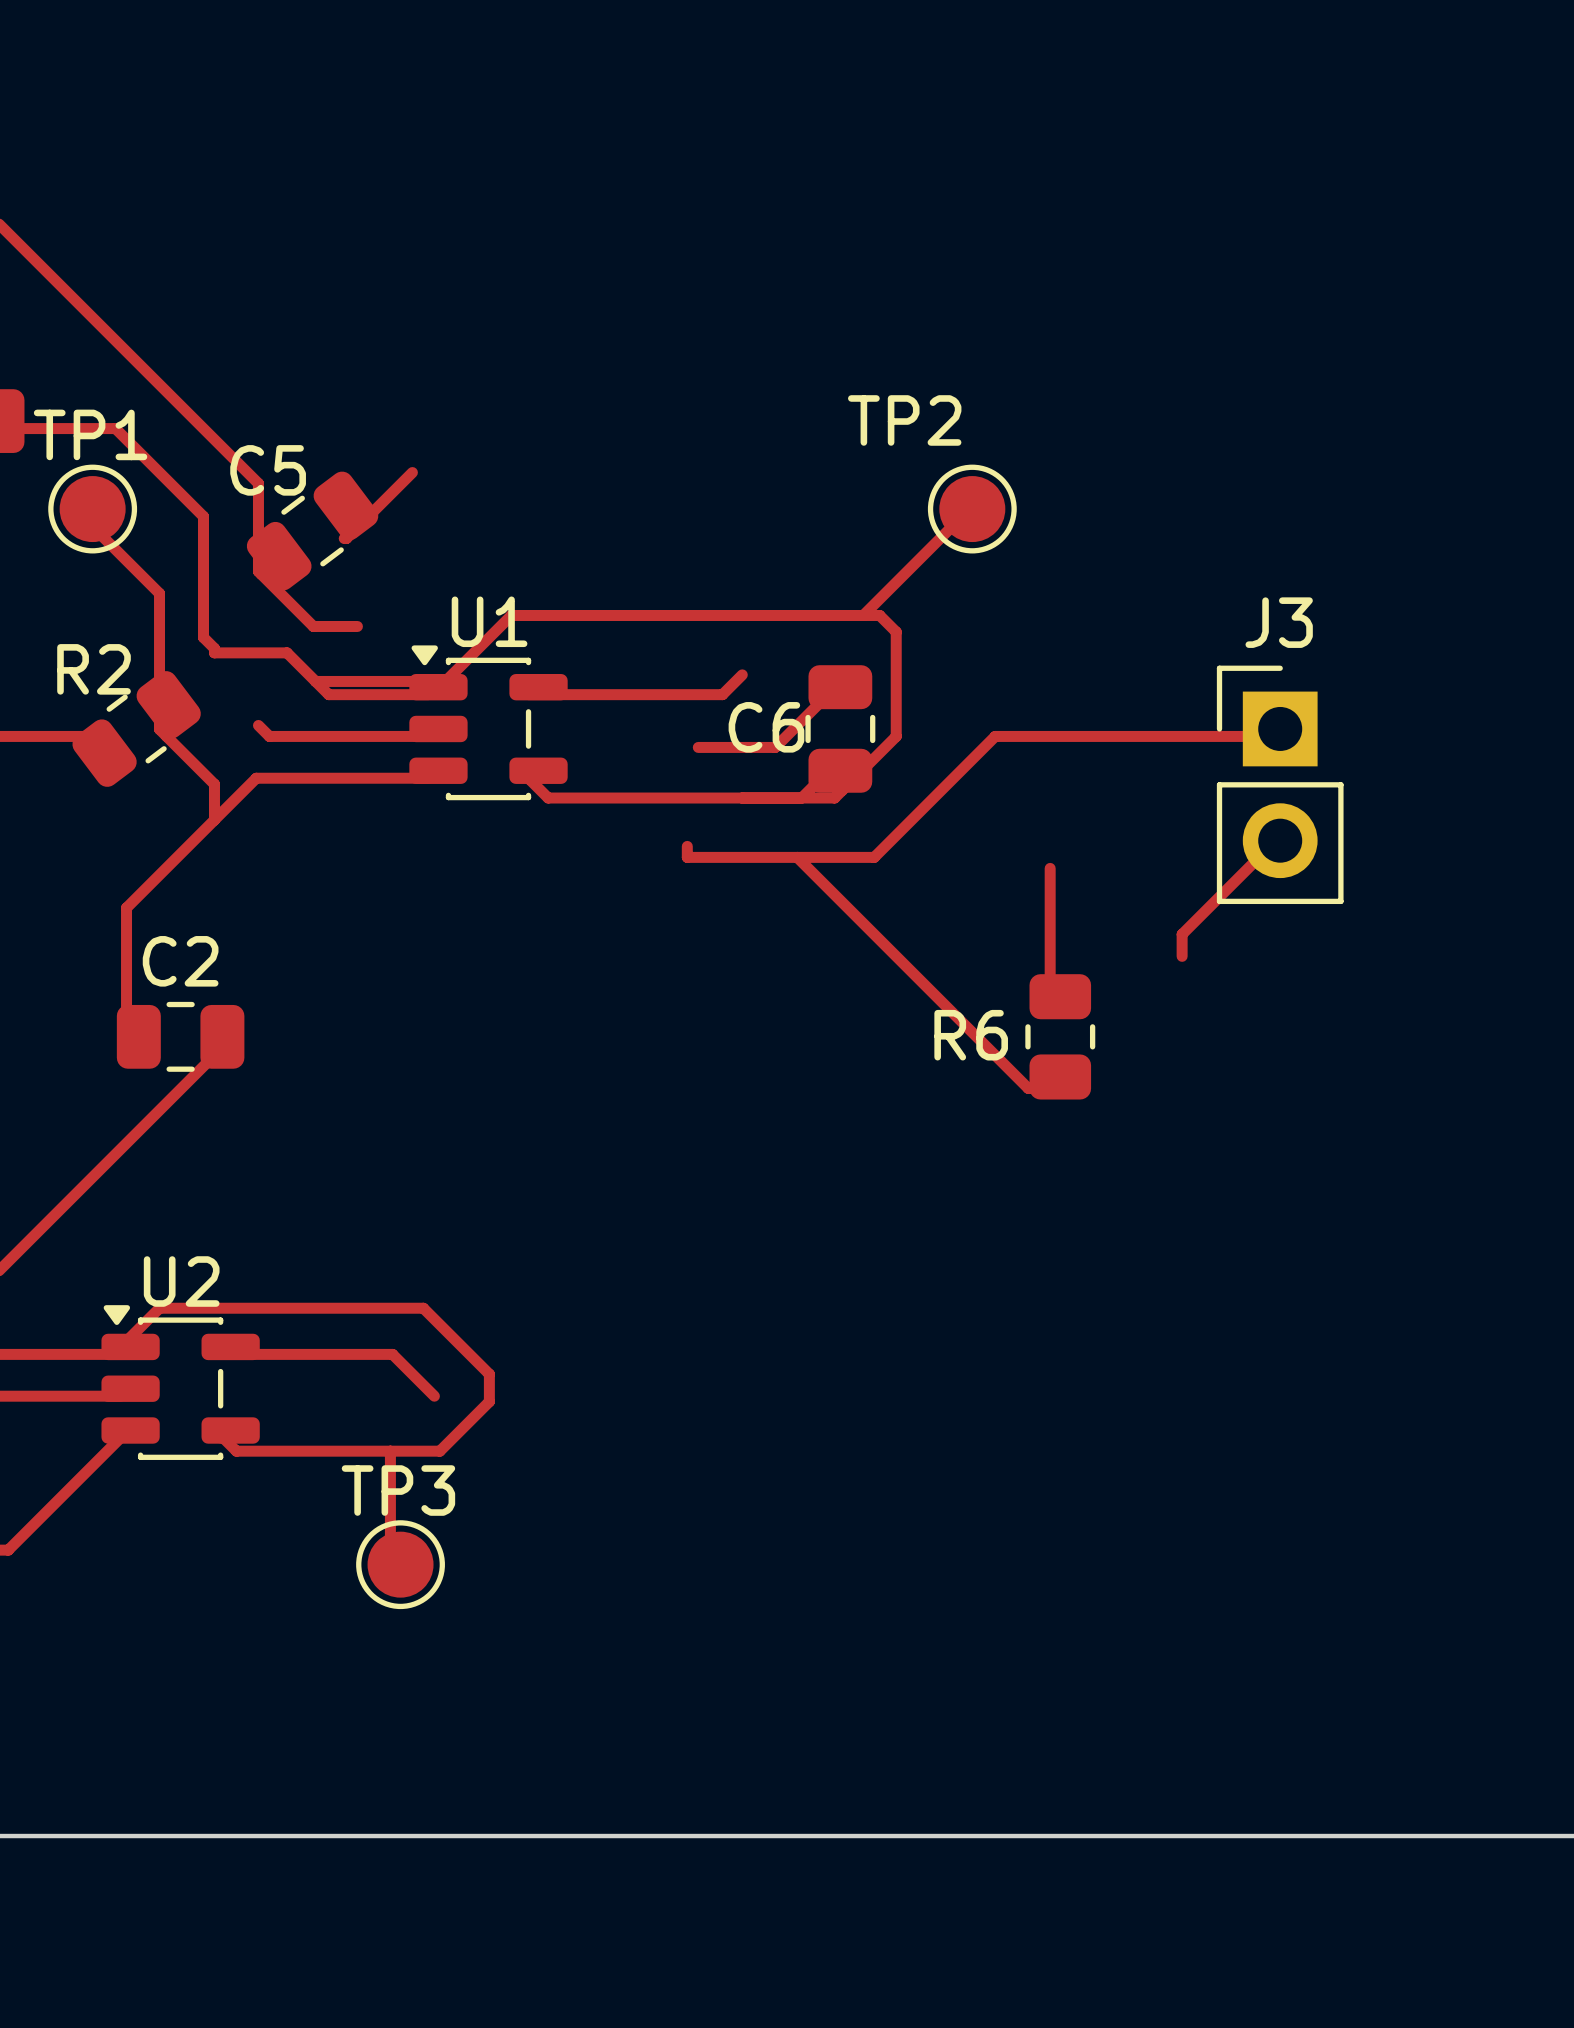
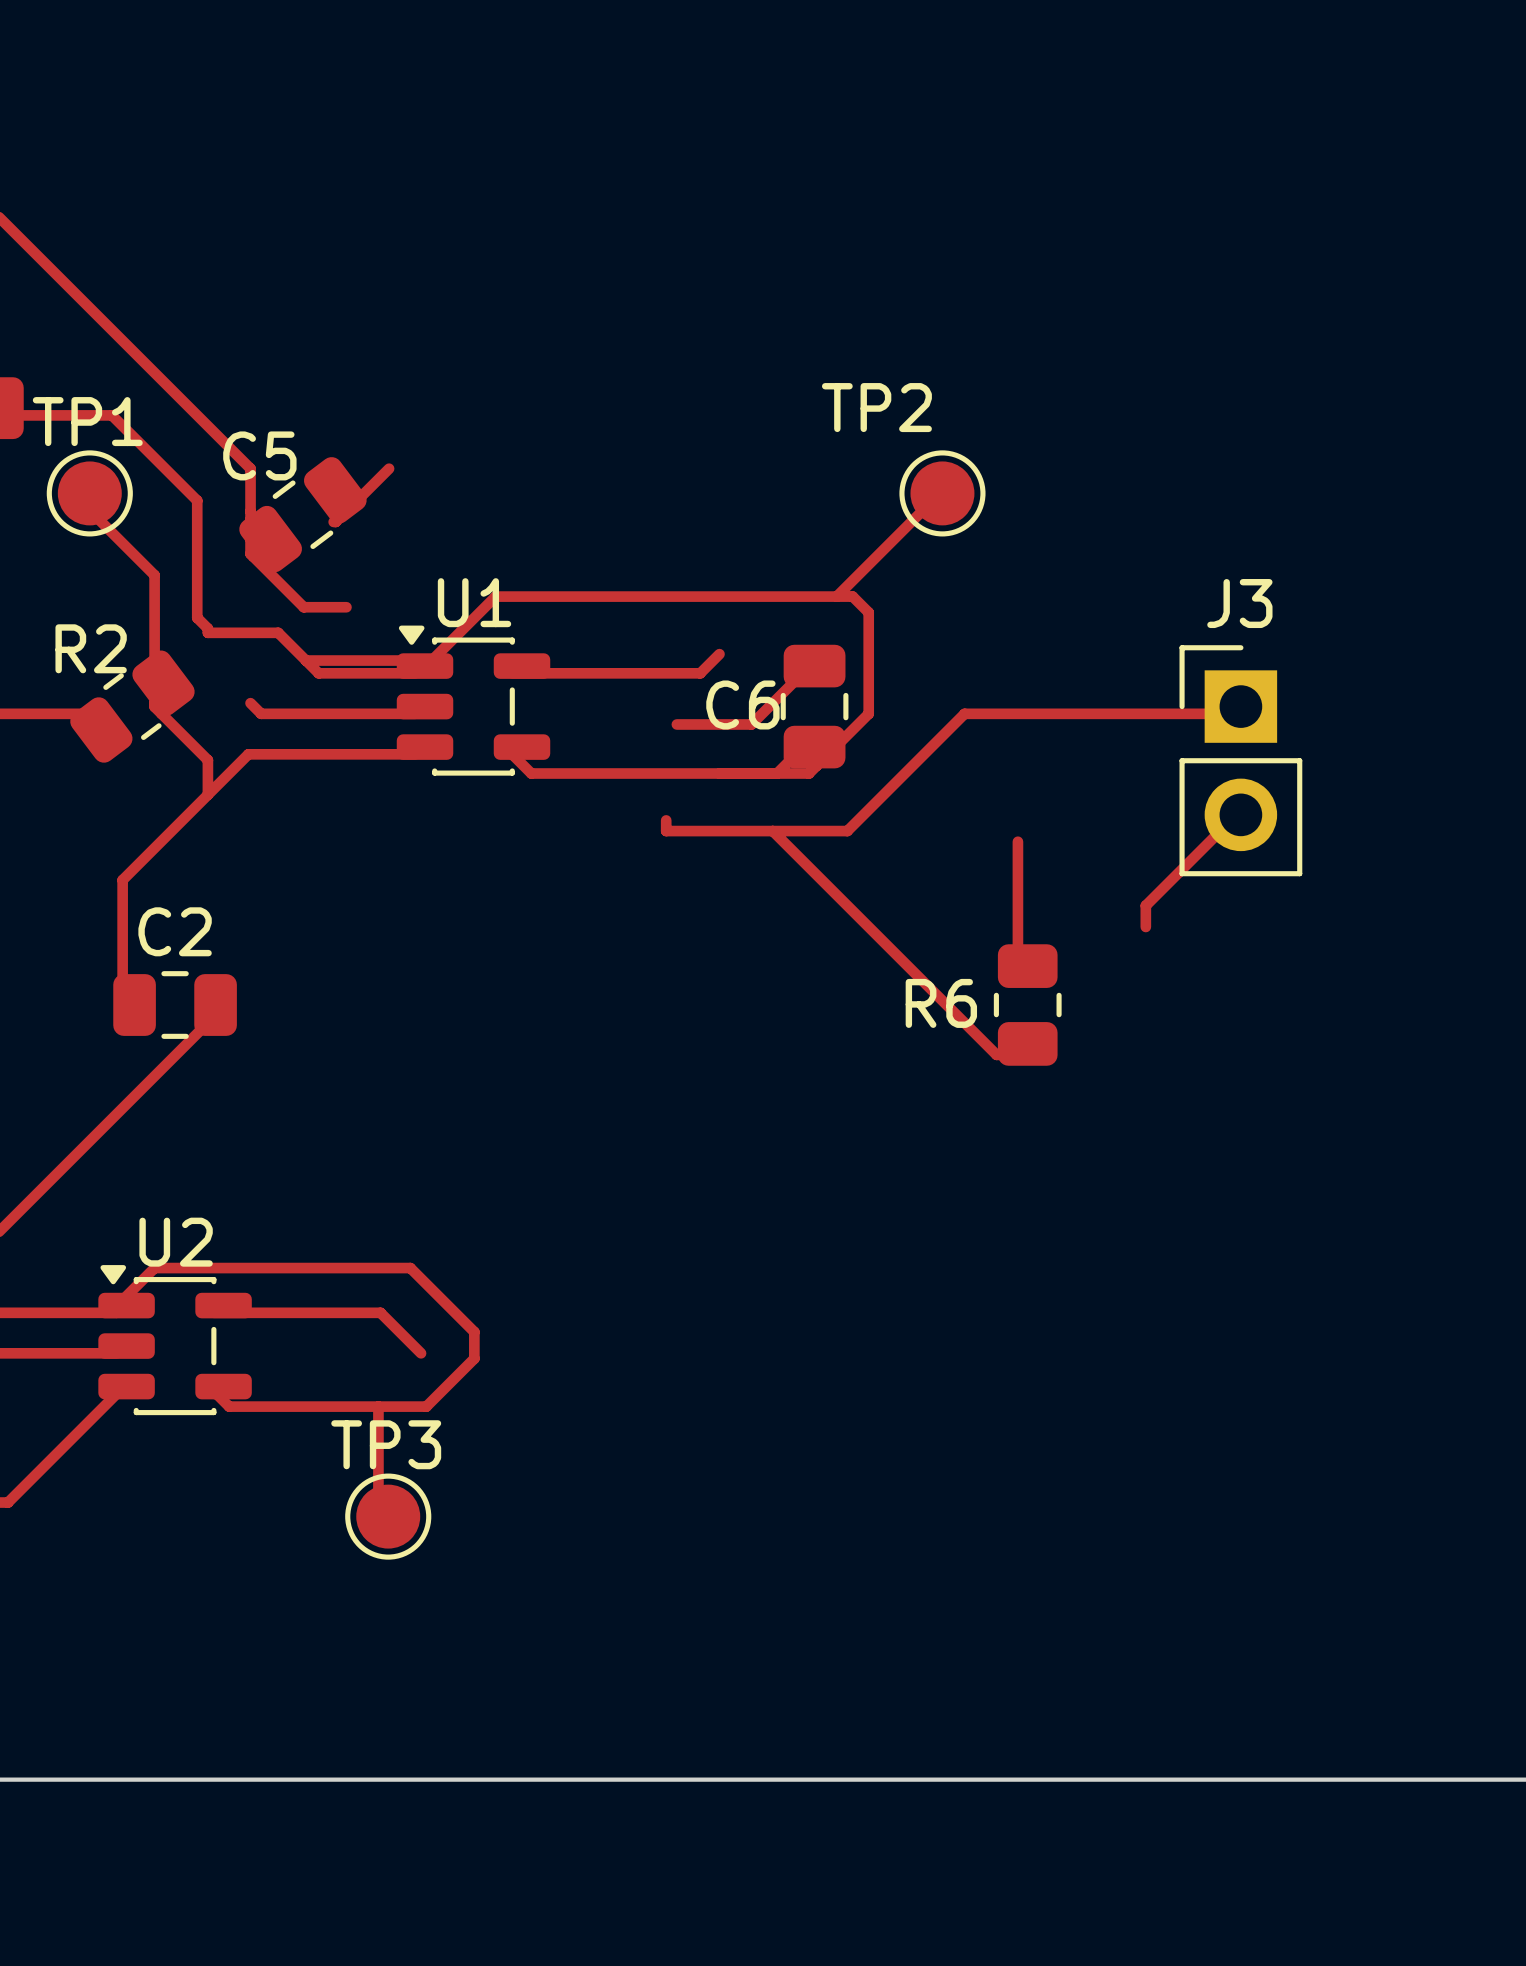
track: (412, 472) (401, 483) -> none

